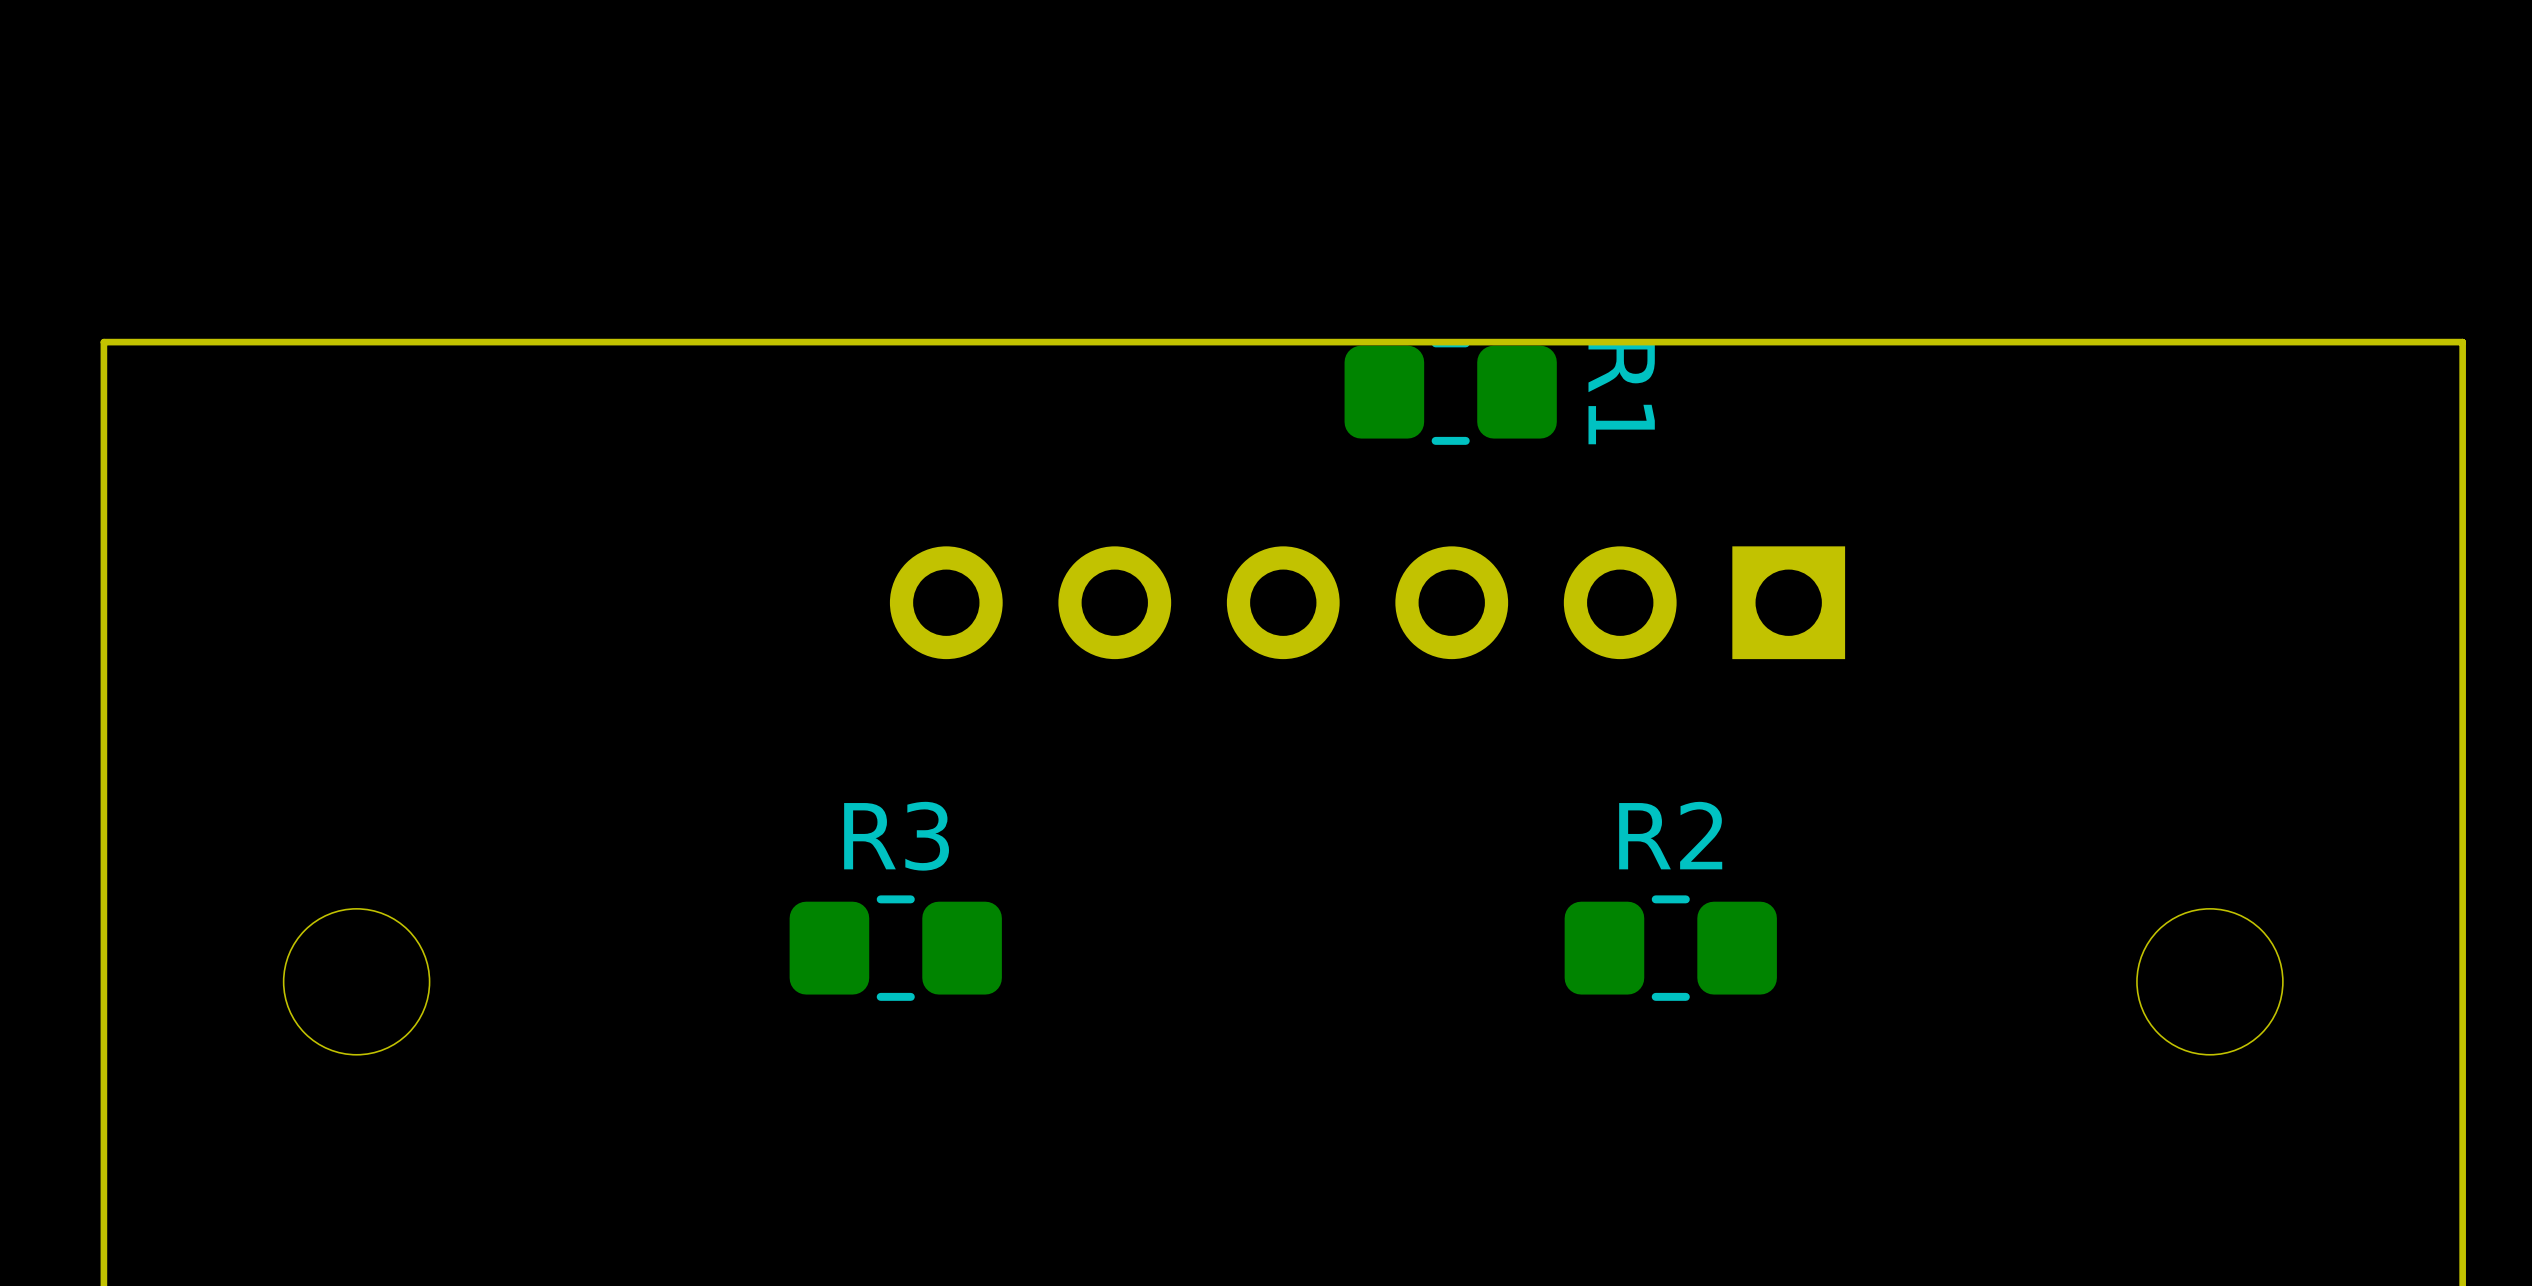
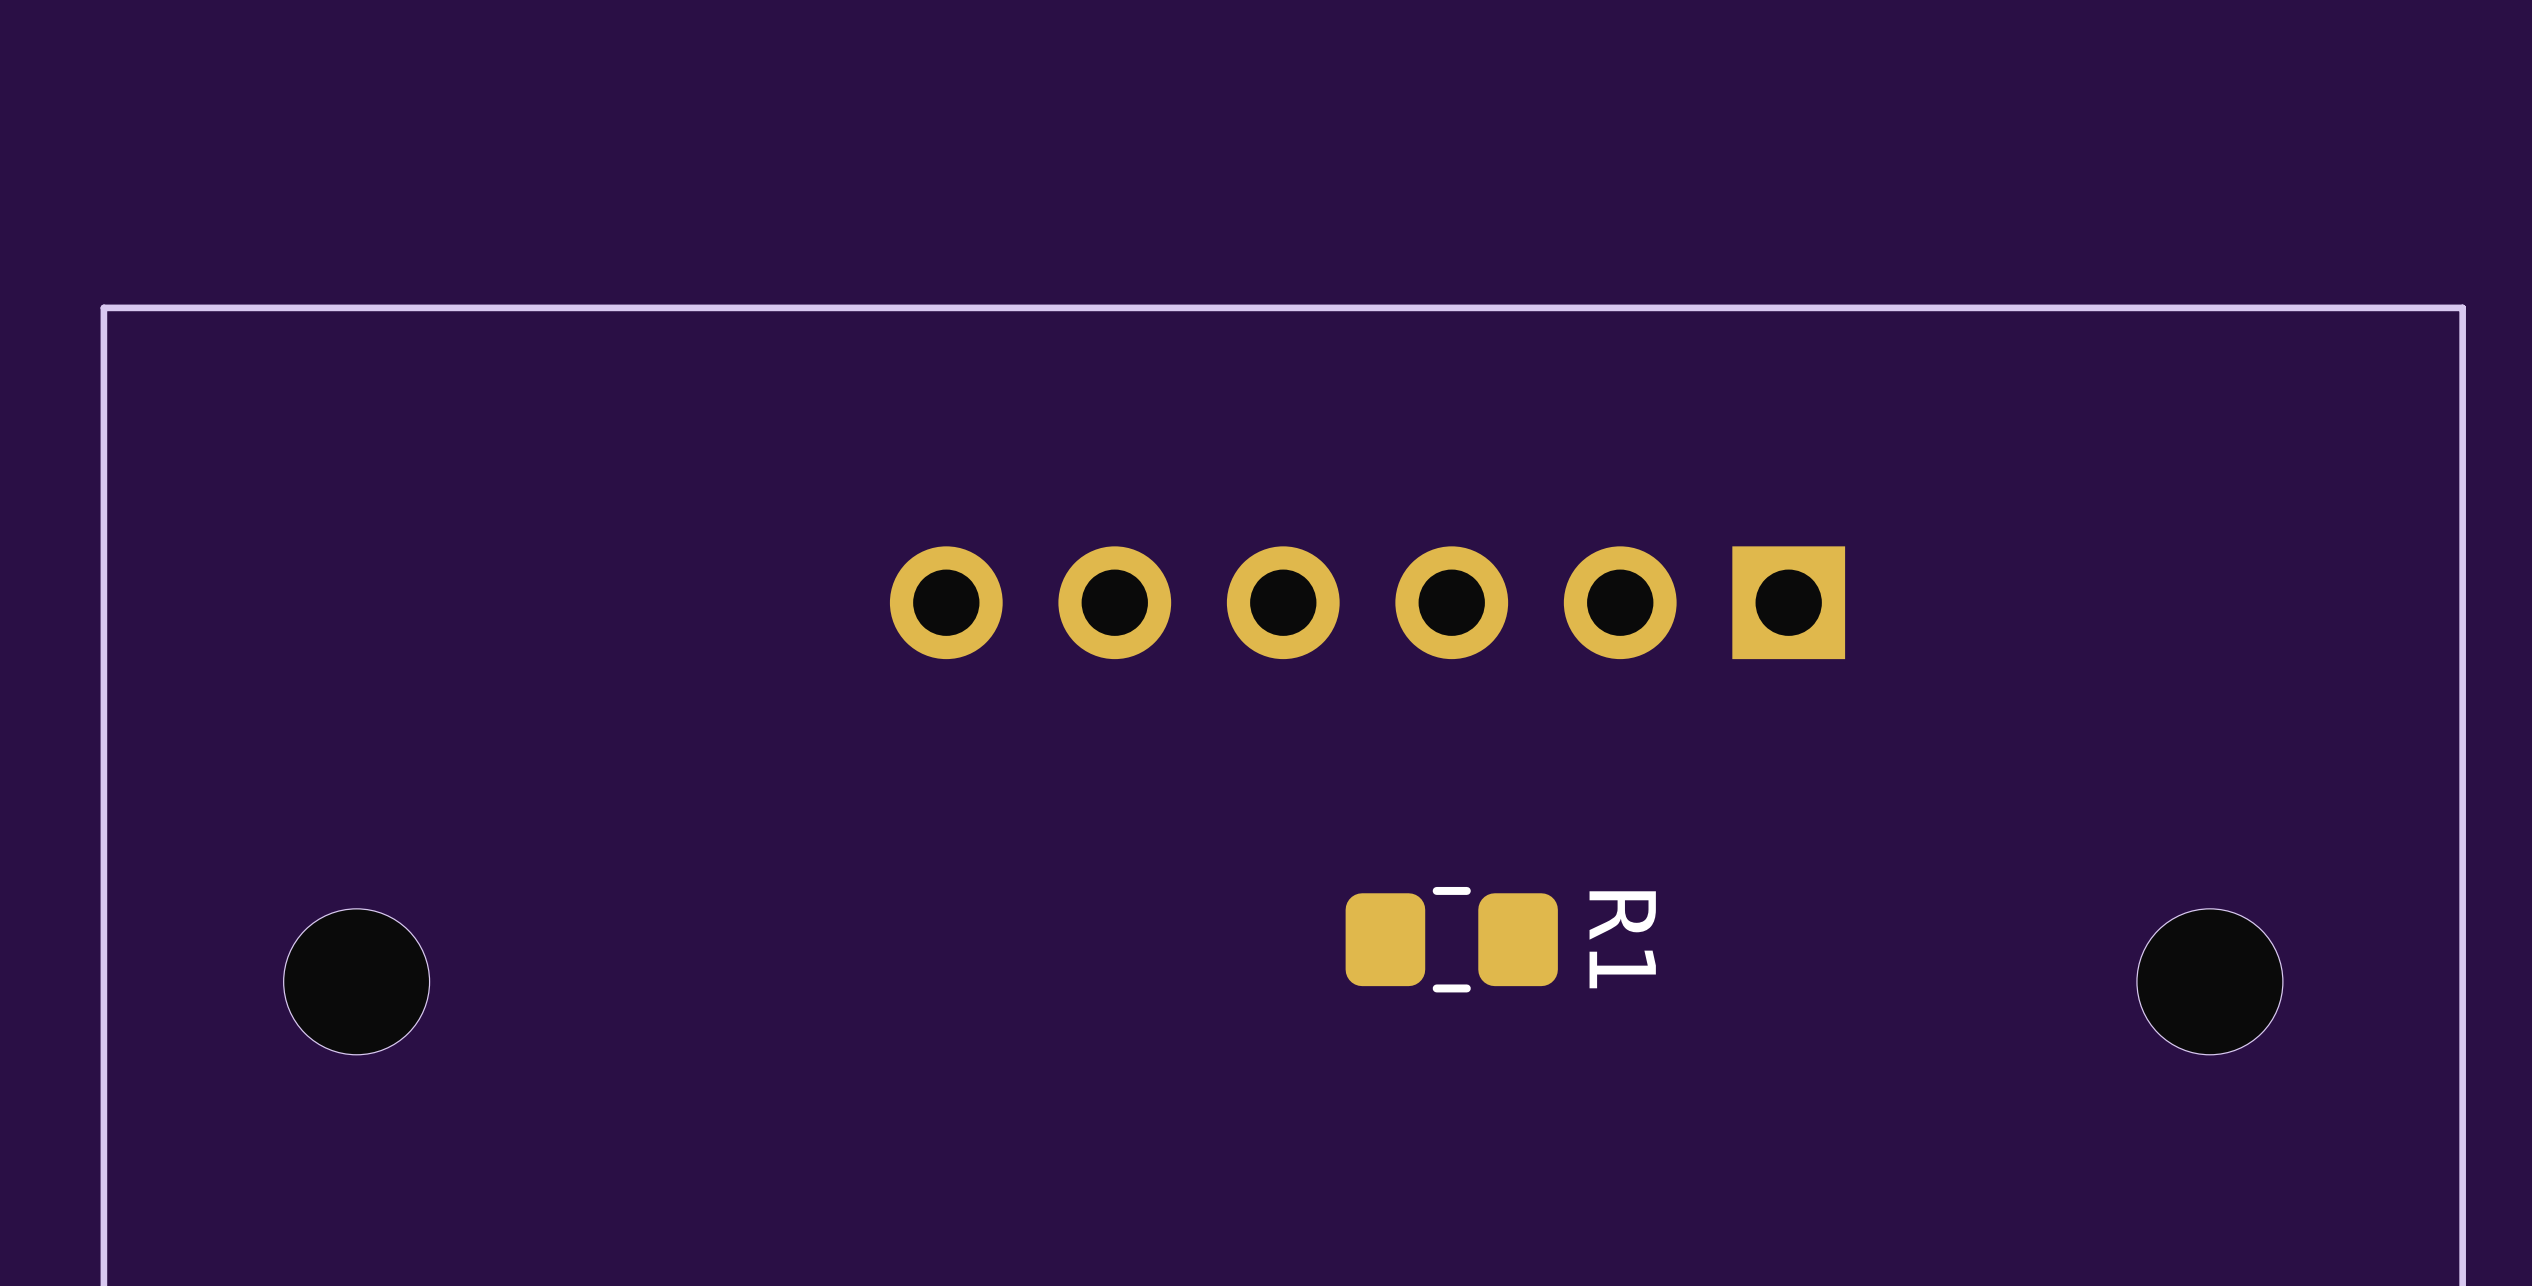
board edge: (2462, 342) (103, 342) -> (2462, 342) (2462, 307) (103, 307) (103, 342)
R1 position: (1450, 392) -> (1451, 939)
R3: (895, 948) -> none
R2: (1670, 948) -> none

